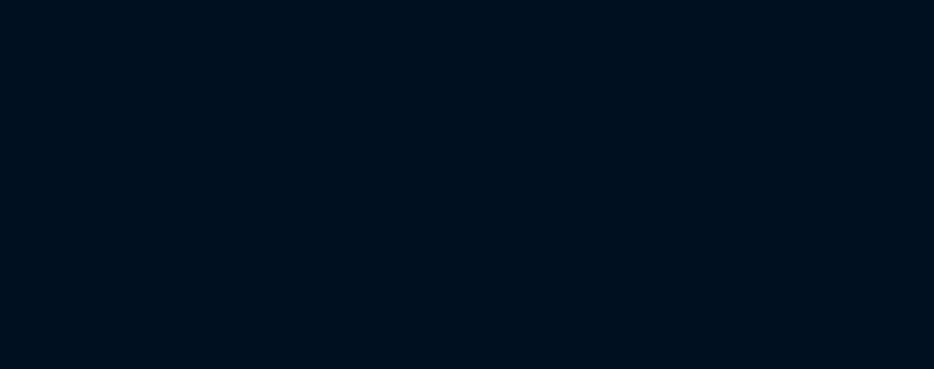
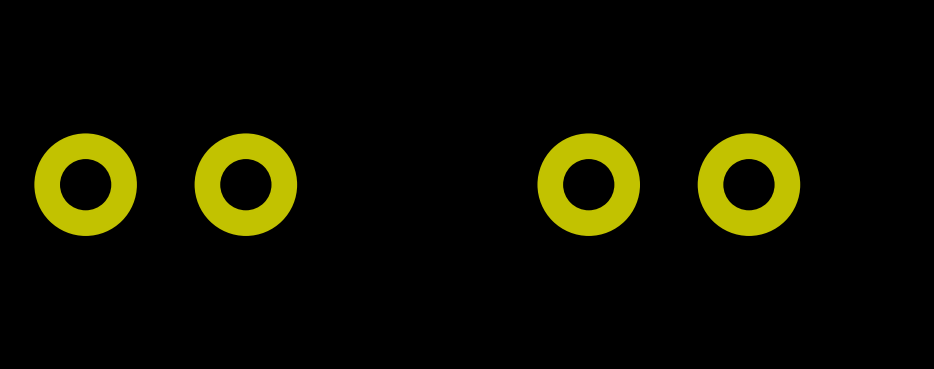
part: none -> (165, 184)
part: none -> (668, 184)

